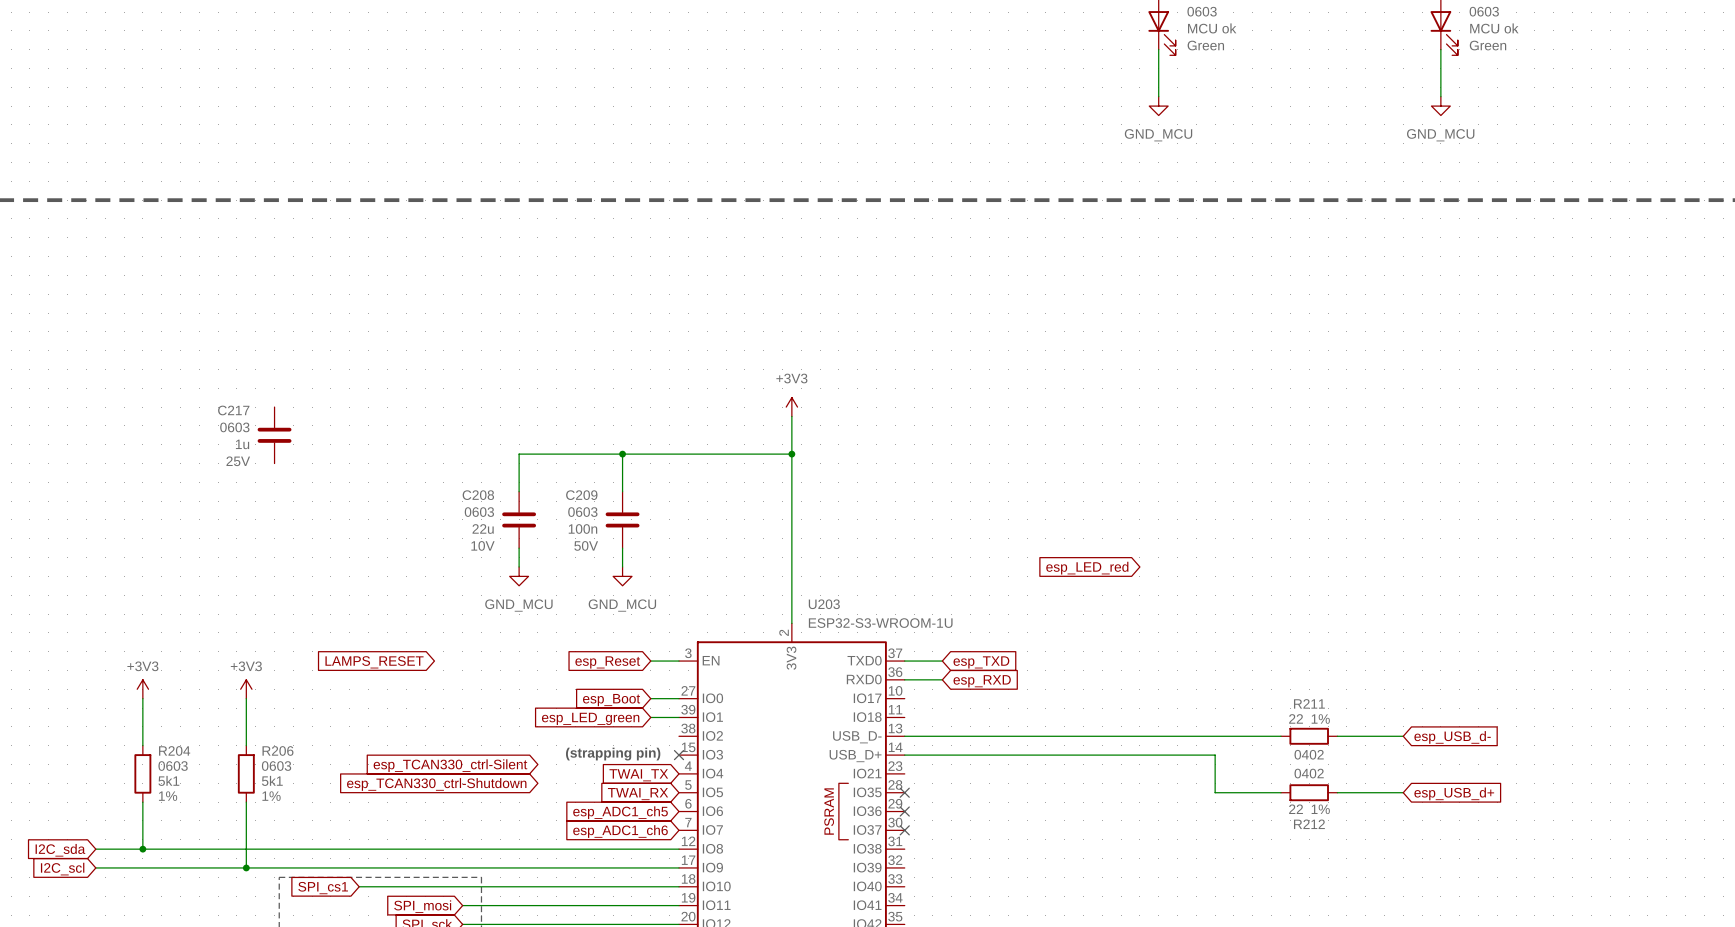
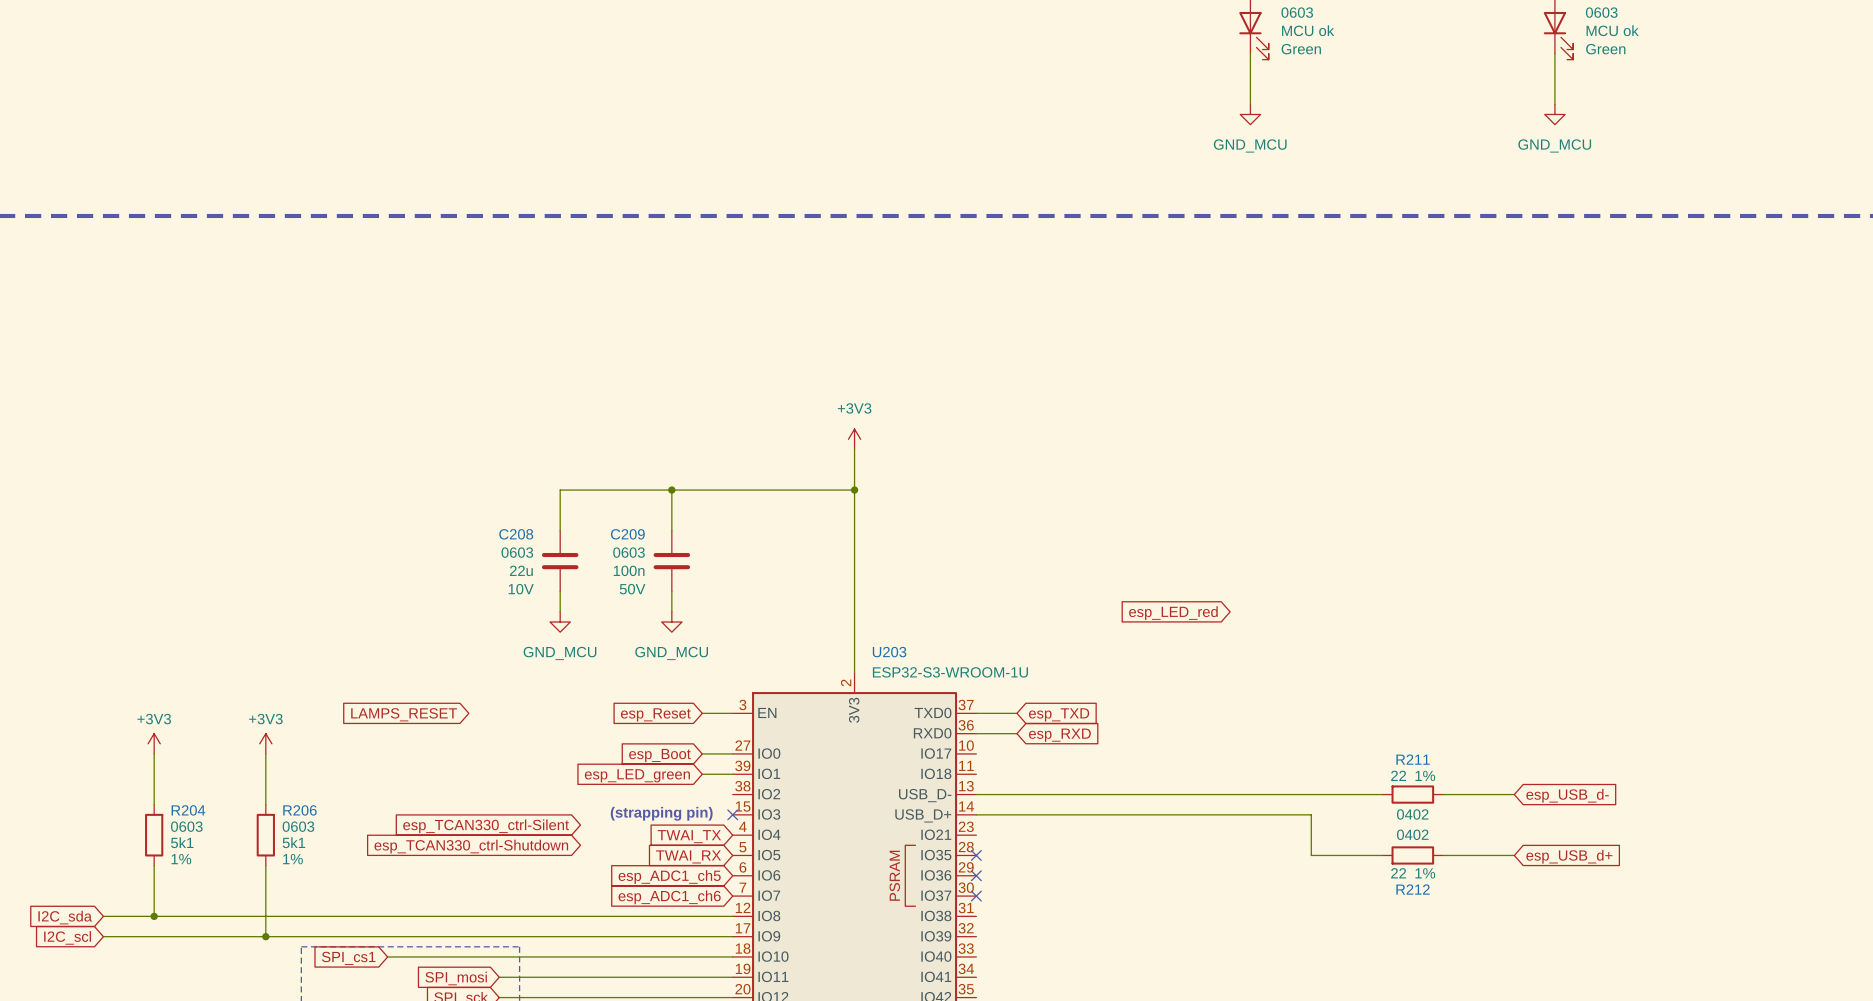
C217: 1u (274, 435) -> none

